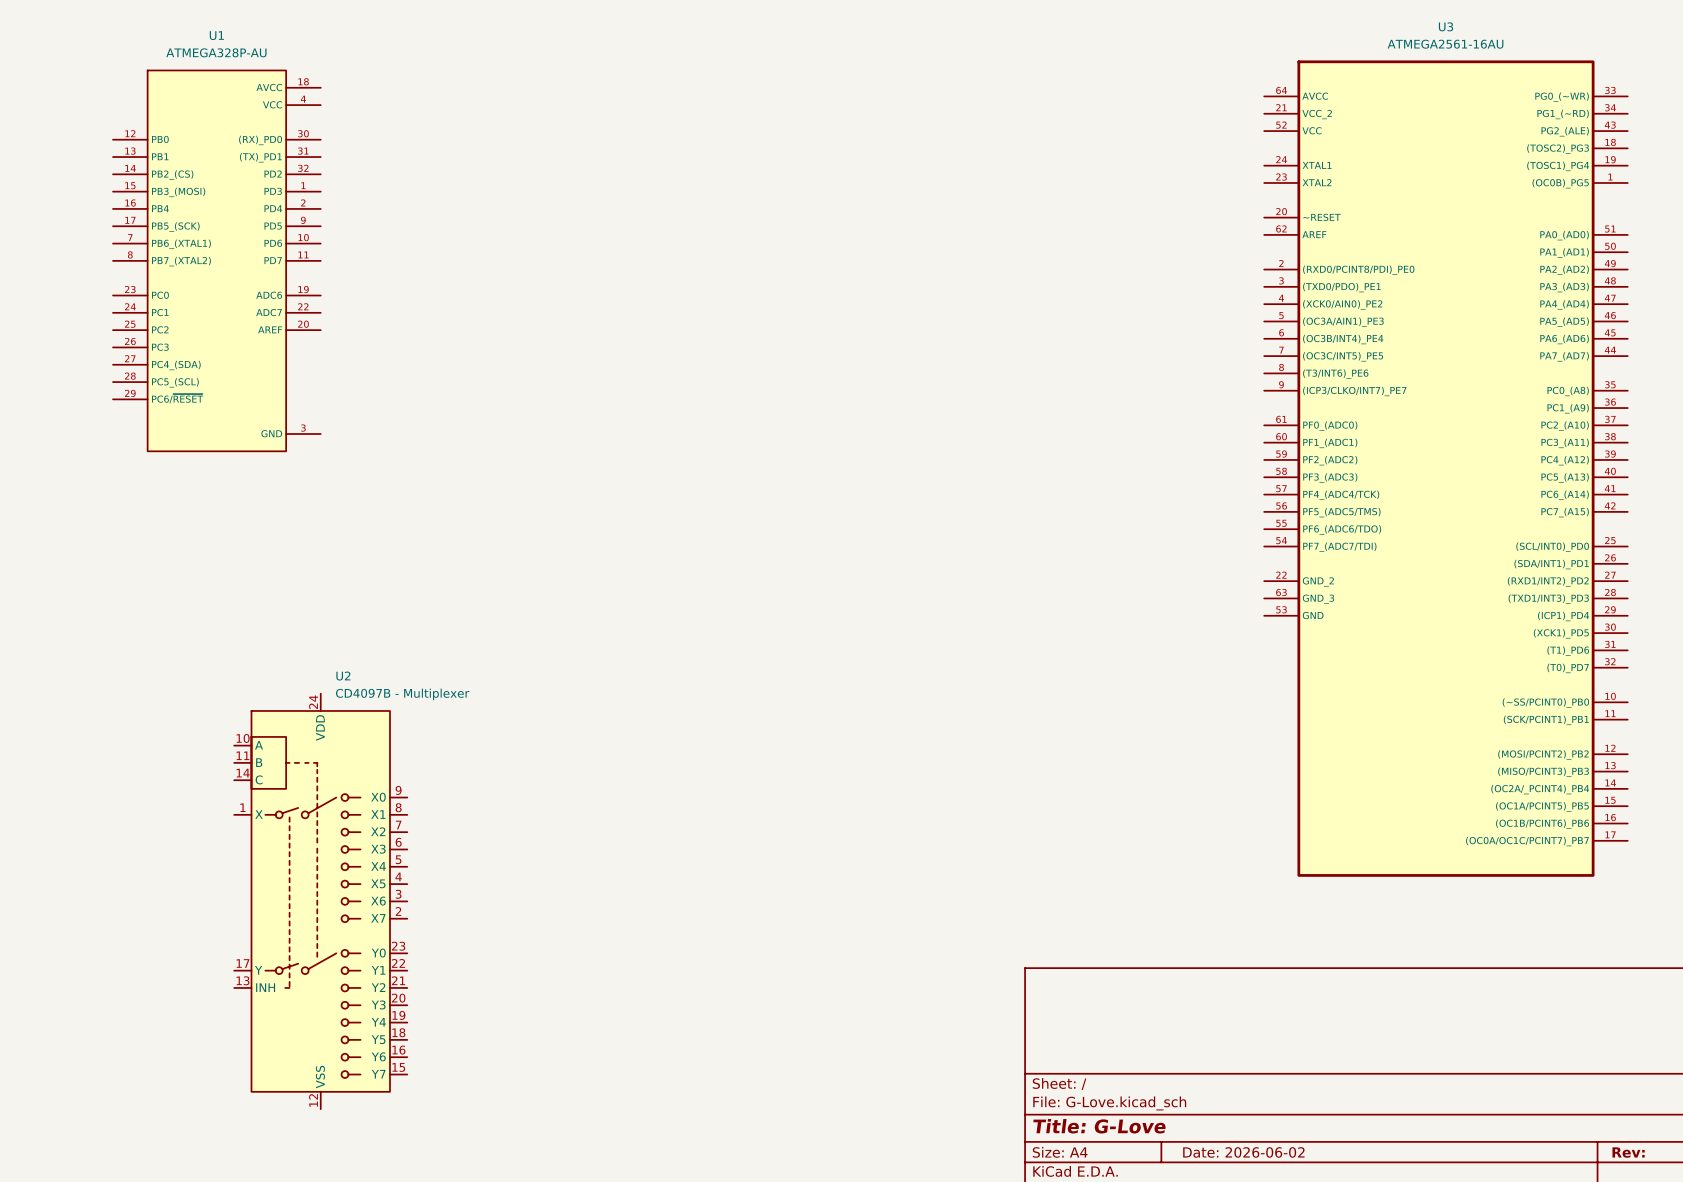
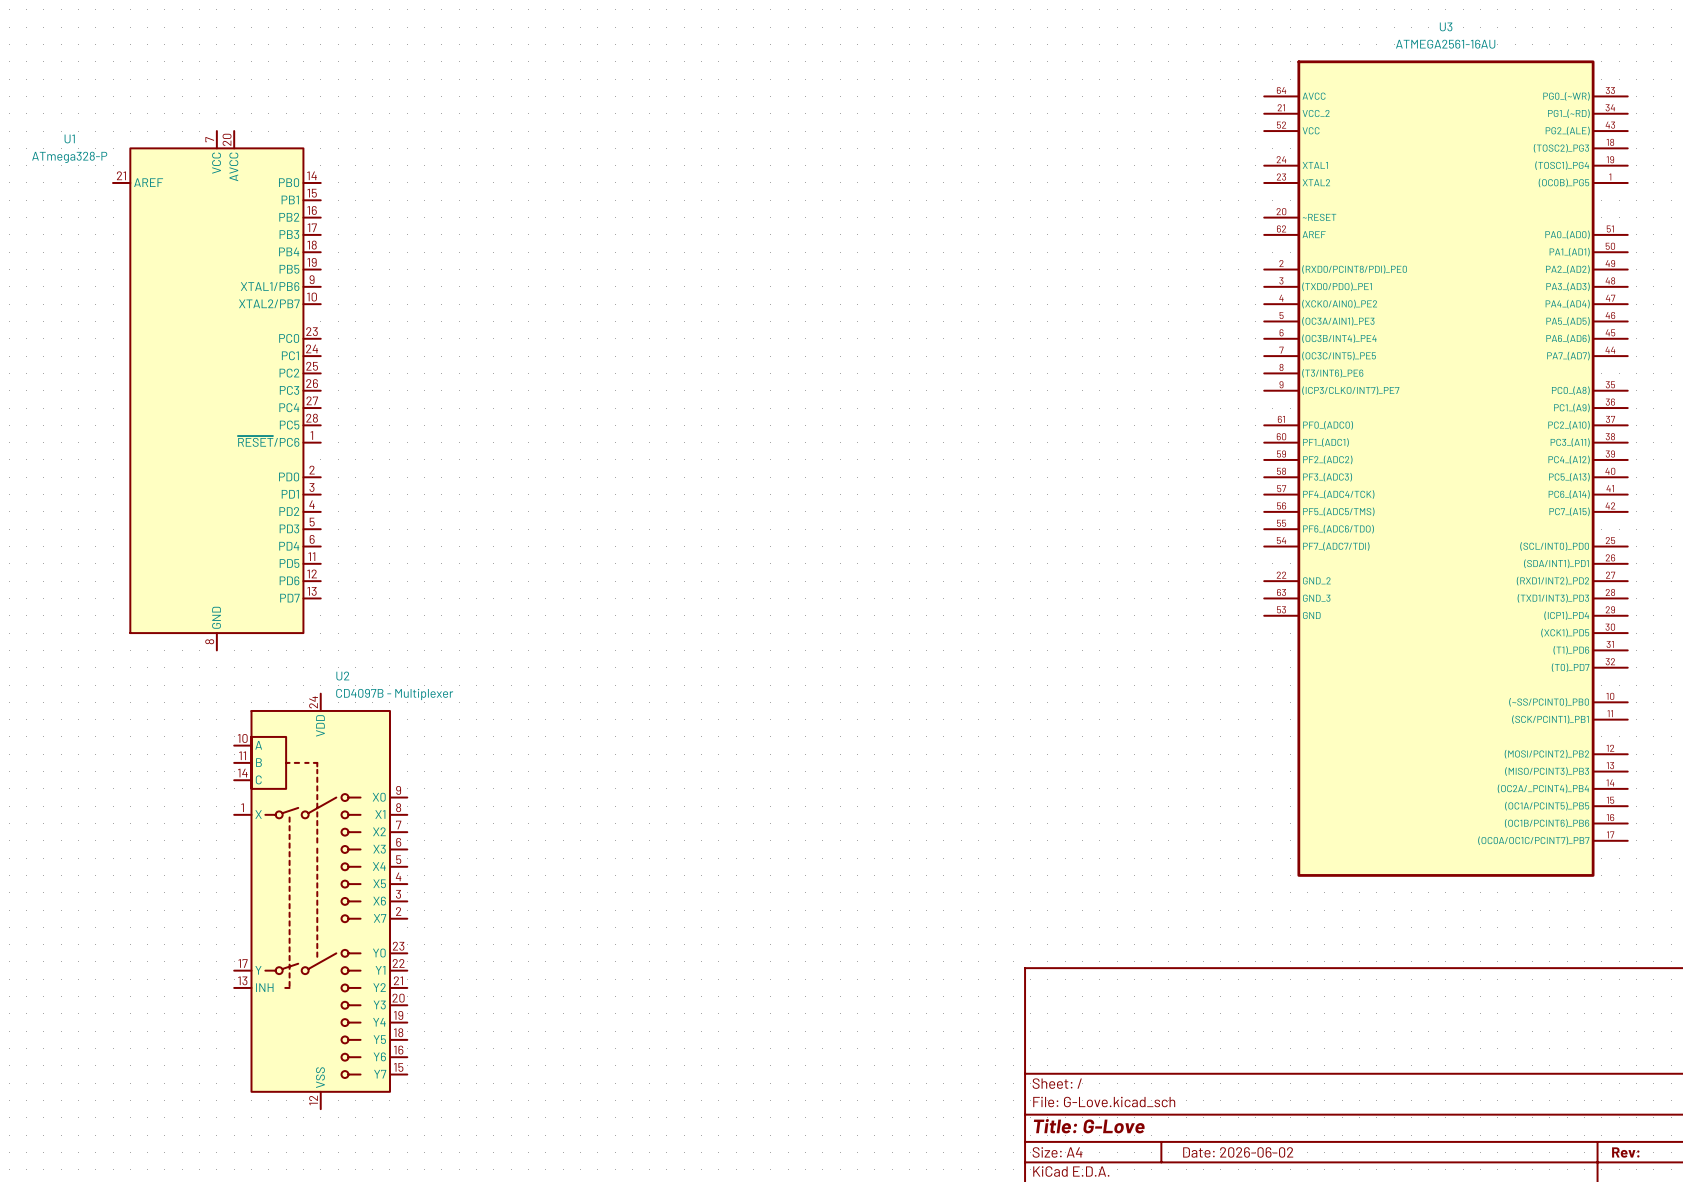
U1 name position: U1 (216, 35) -> U1 (69, 138)
U1 value: ATMEGA328P-AU (216, 52) -> ATmega328-P (69, 157)
U1 symbol: [113, 69, 321, 453] -> [113, 131, 321, 651]

